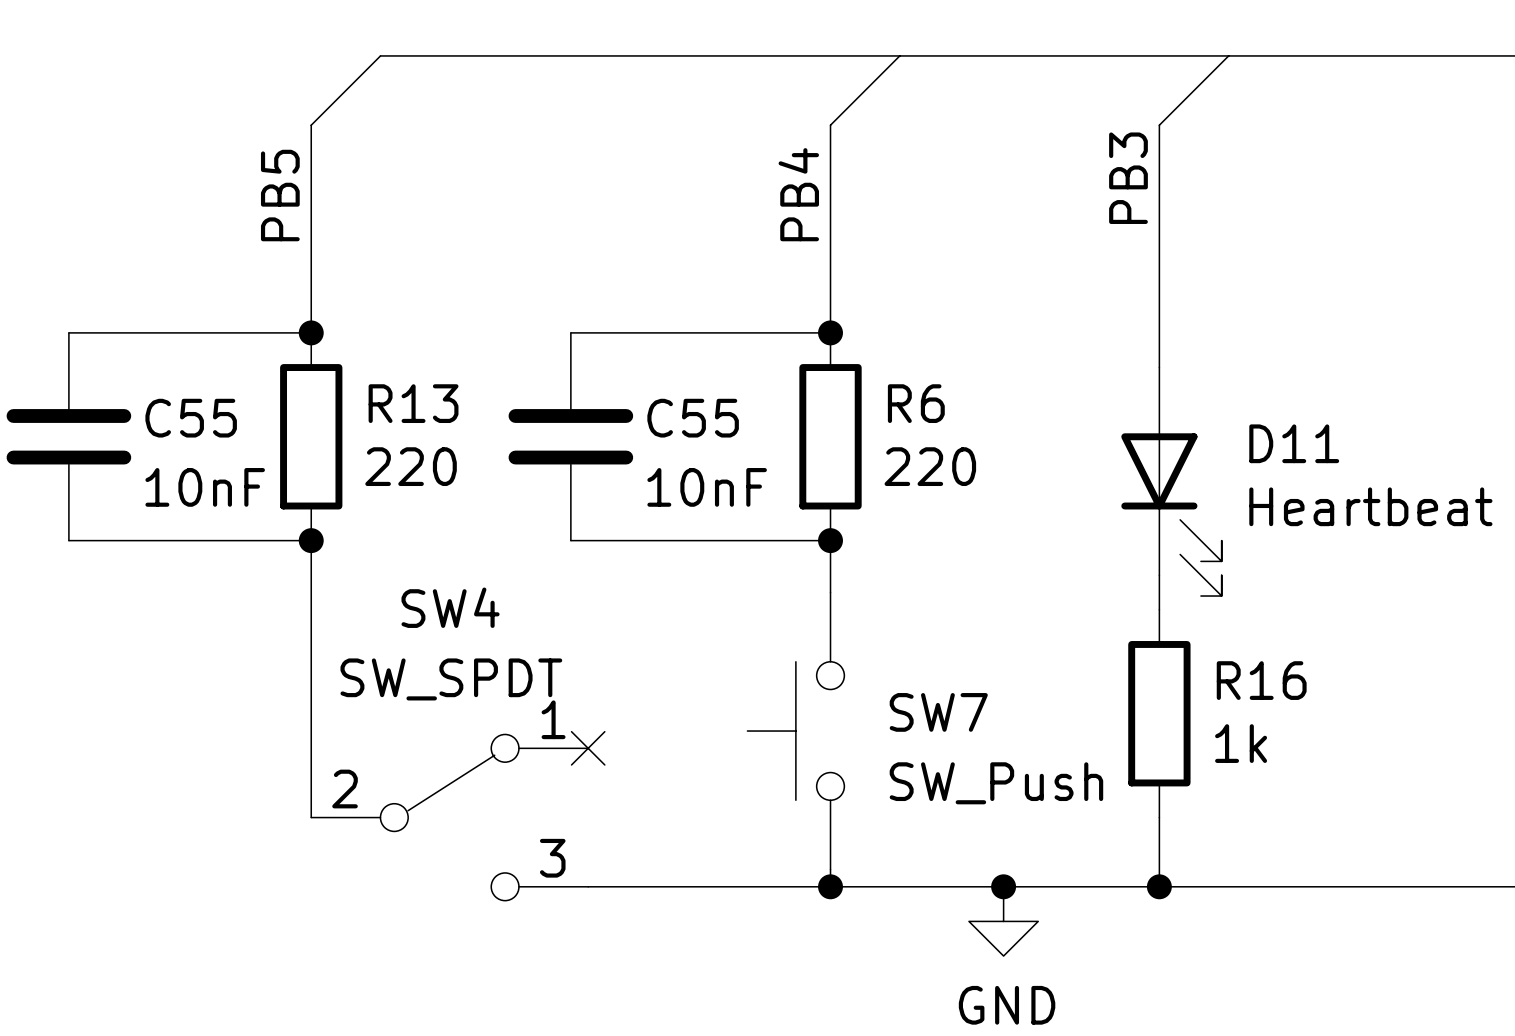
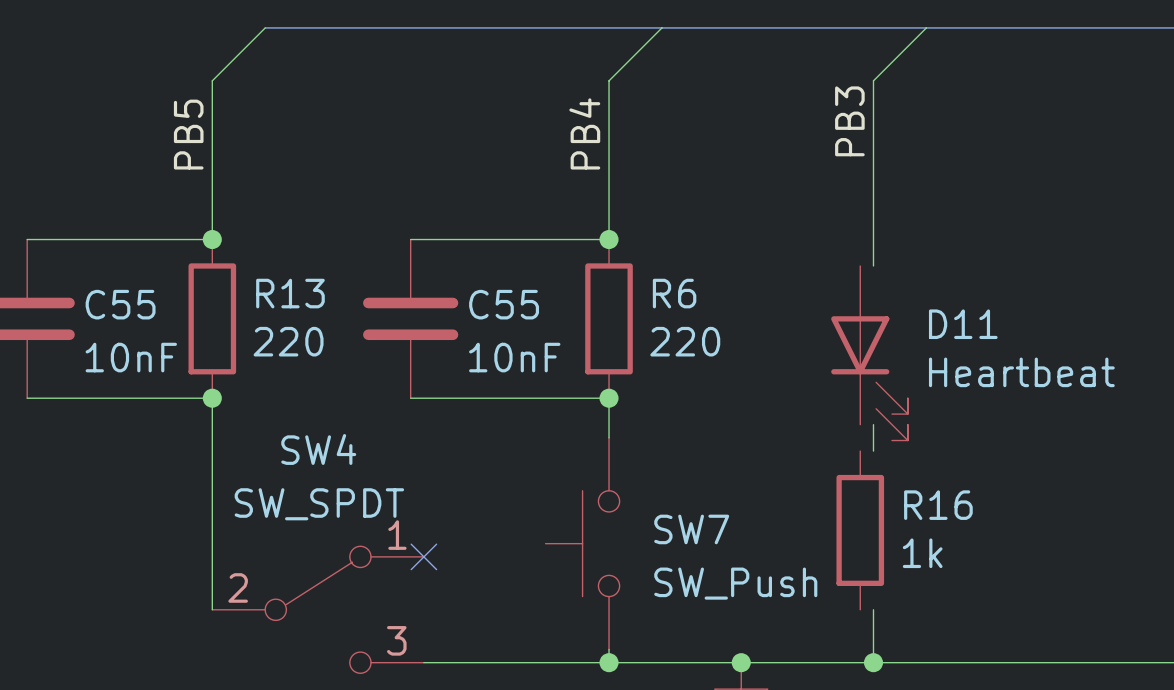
wire: (1228, 55) (1159, 125) (1159, 367) -> (926, 27) (873, 80) (873, 265)
label position: PB3 (1128, 178) -> PB3 (849, 121)
wire: (1159, 575) (1159, 609) -> (873, 424) (873, 451)
wire: (1159, 817) (1159, 886) -> (873, 609) (873, 662)
junction position: (1159, 886) -> (873, 662)

